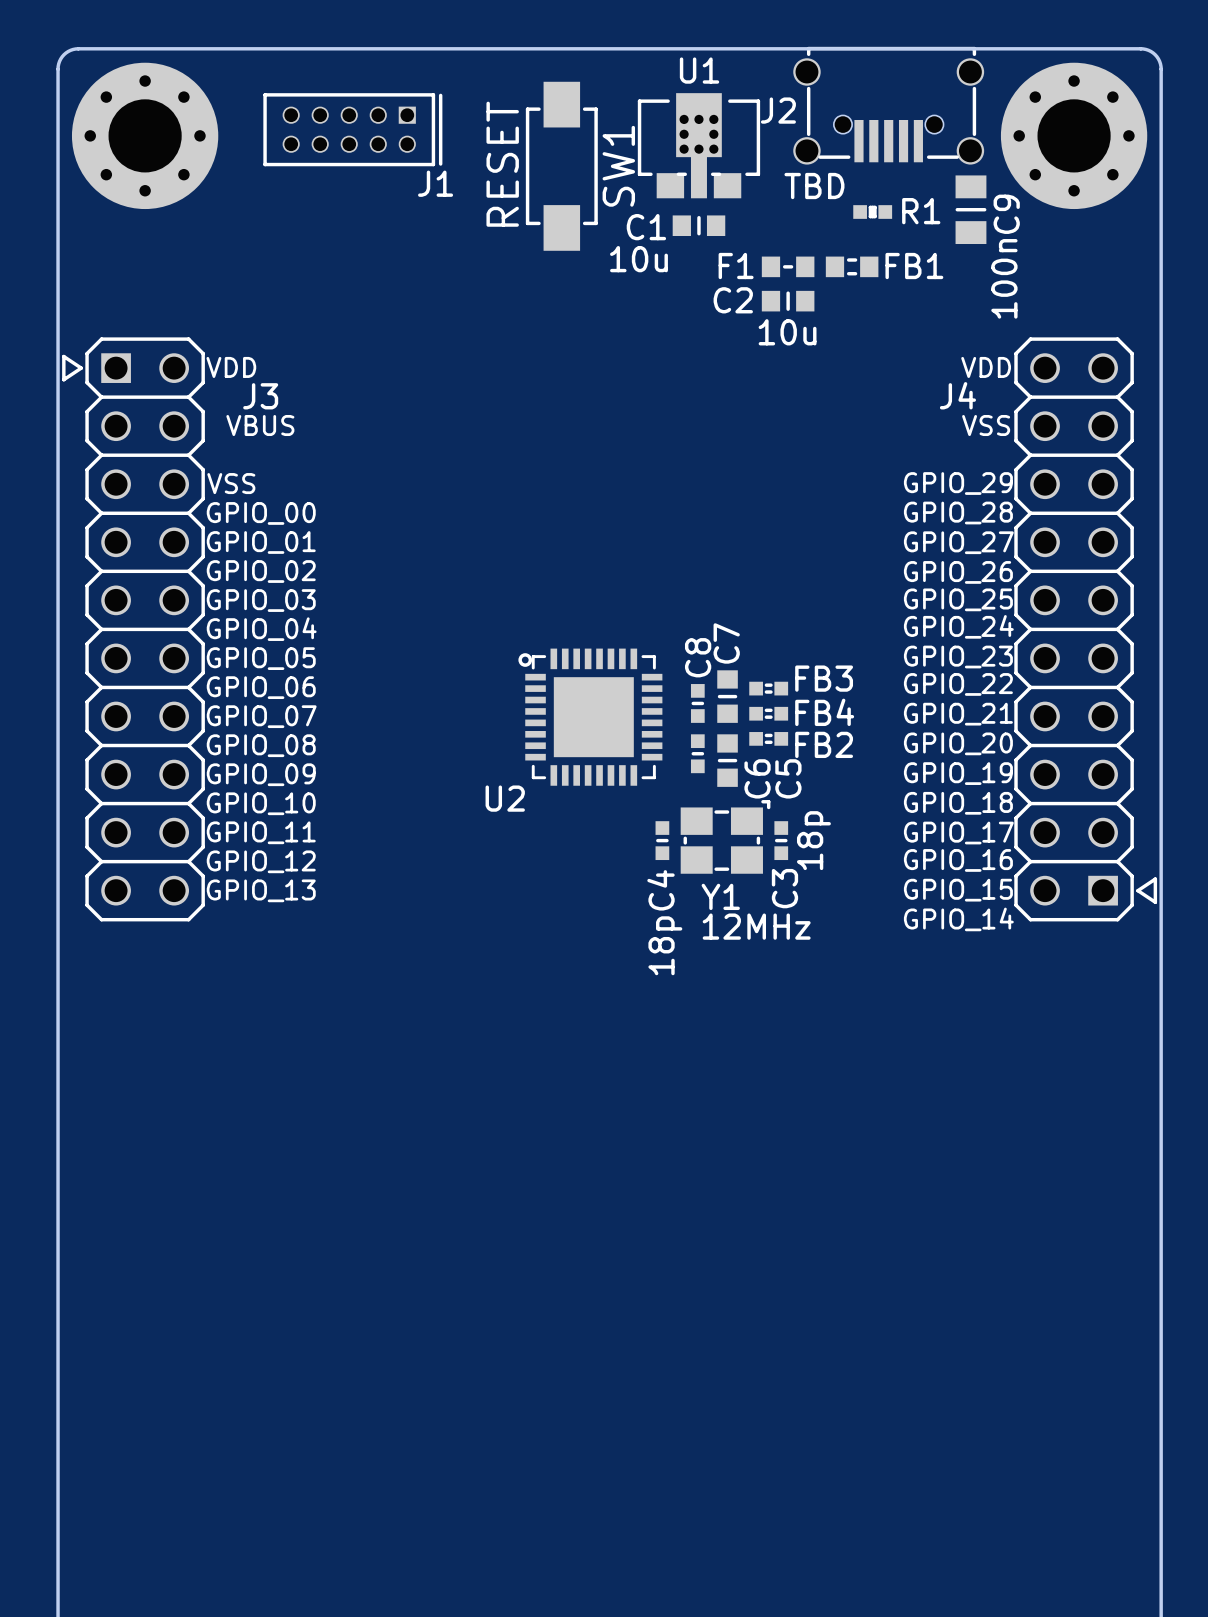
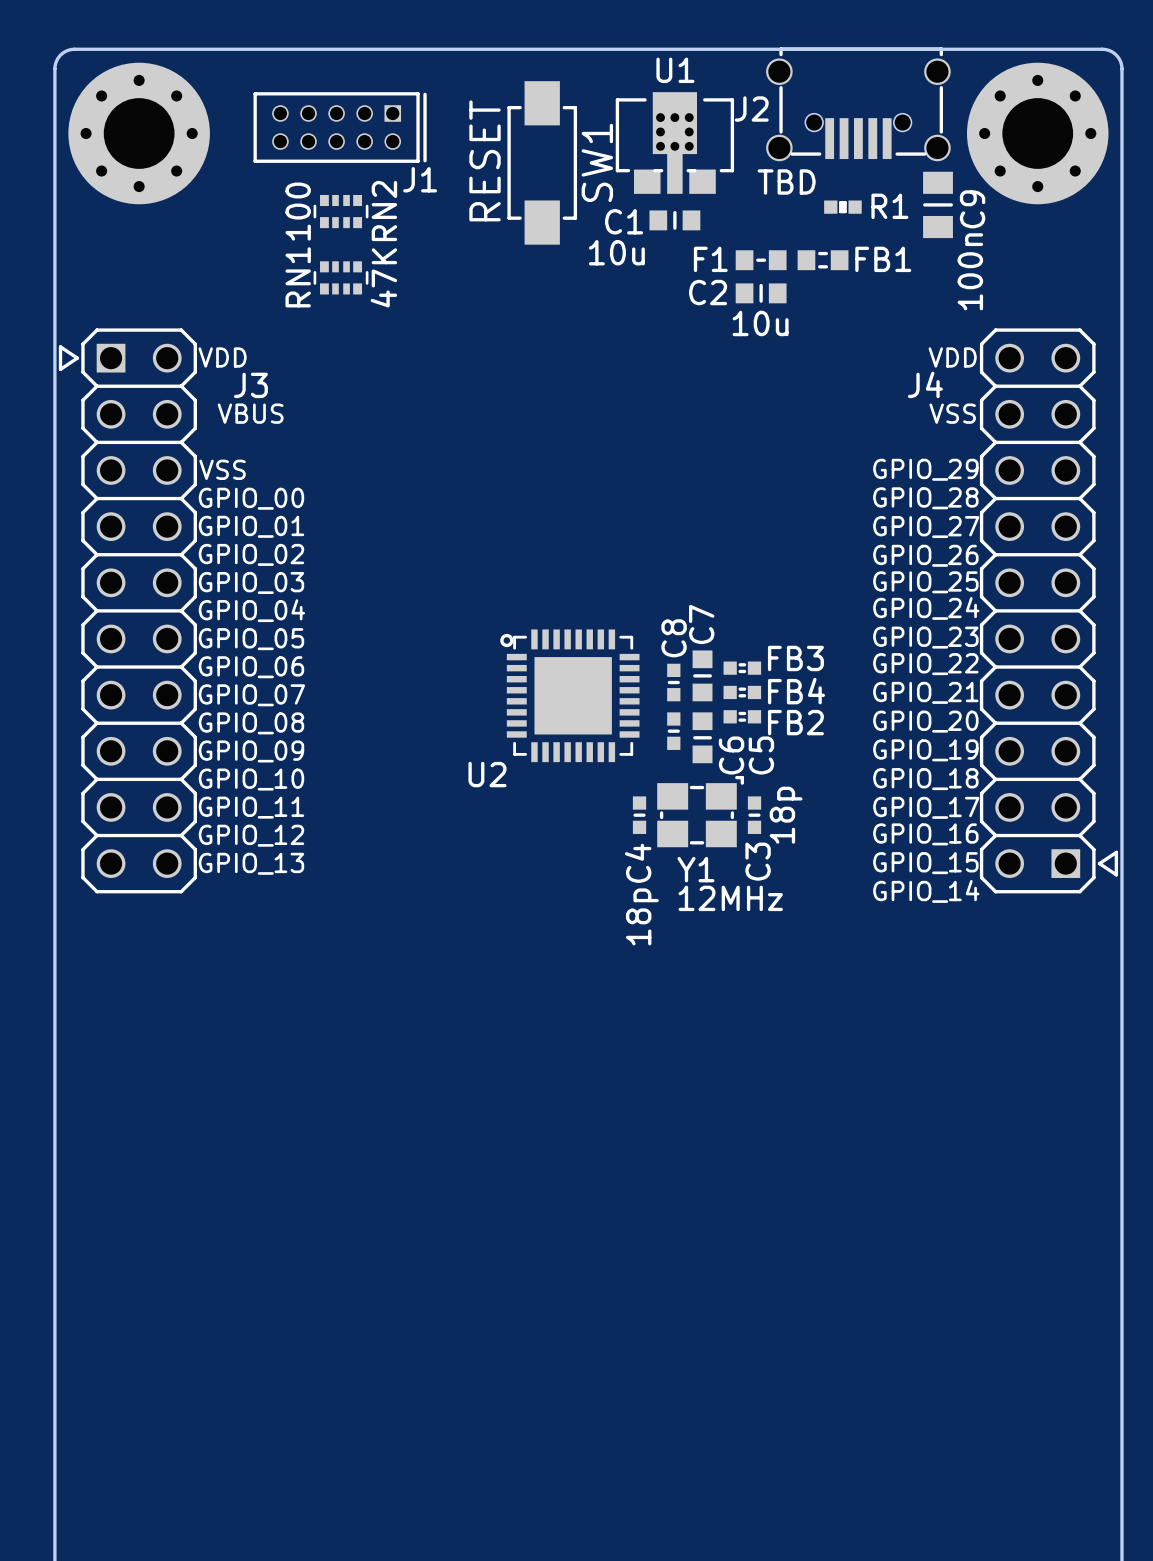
RN2: none -> 100 (341, 211)
RN1: none -> 47K (341, 277)

